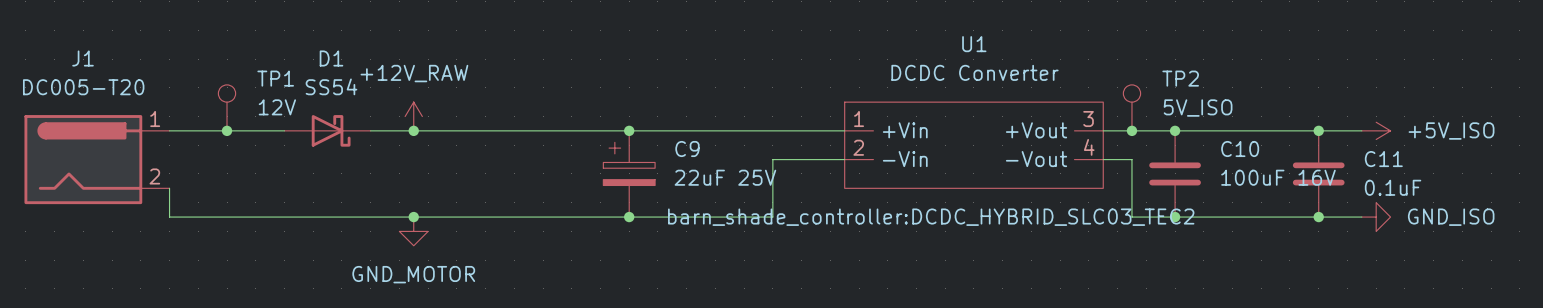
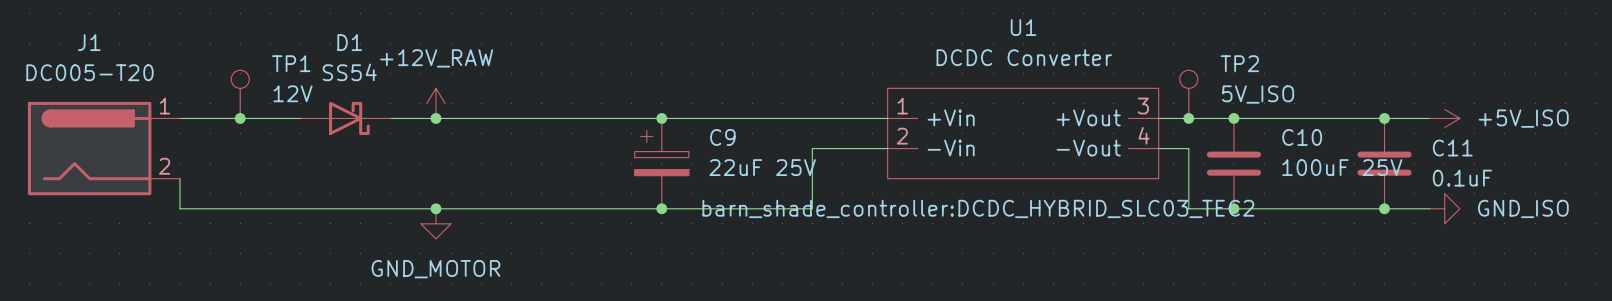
C10 value: 100uF 16V (1278, 177) -> 100uF 25V (1342, 167)

